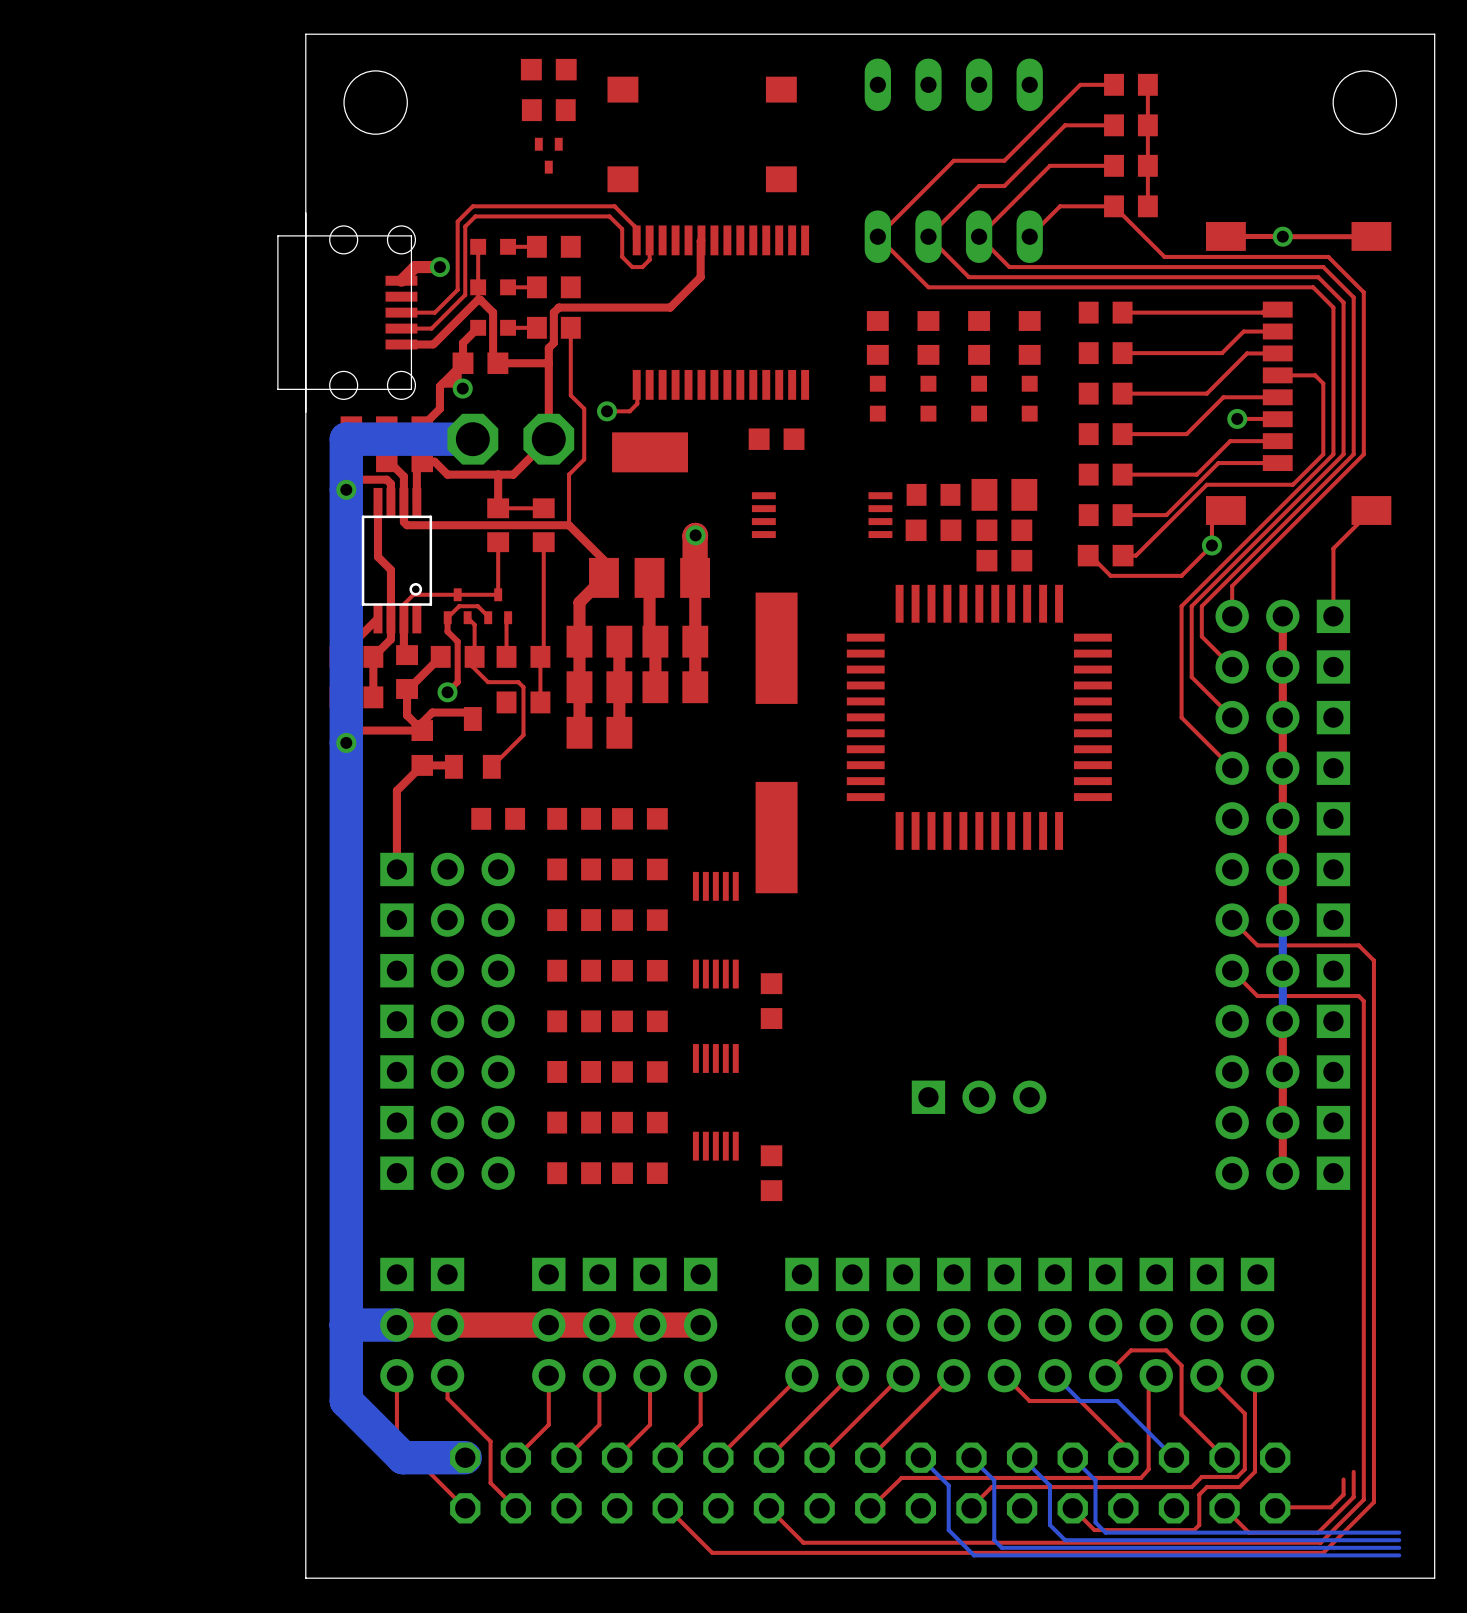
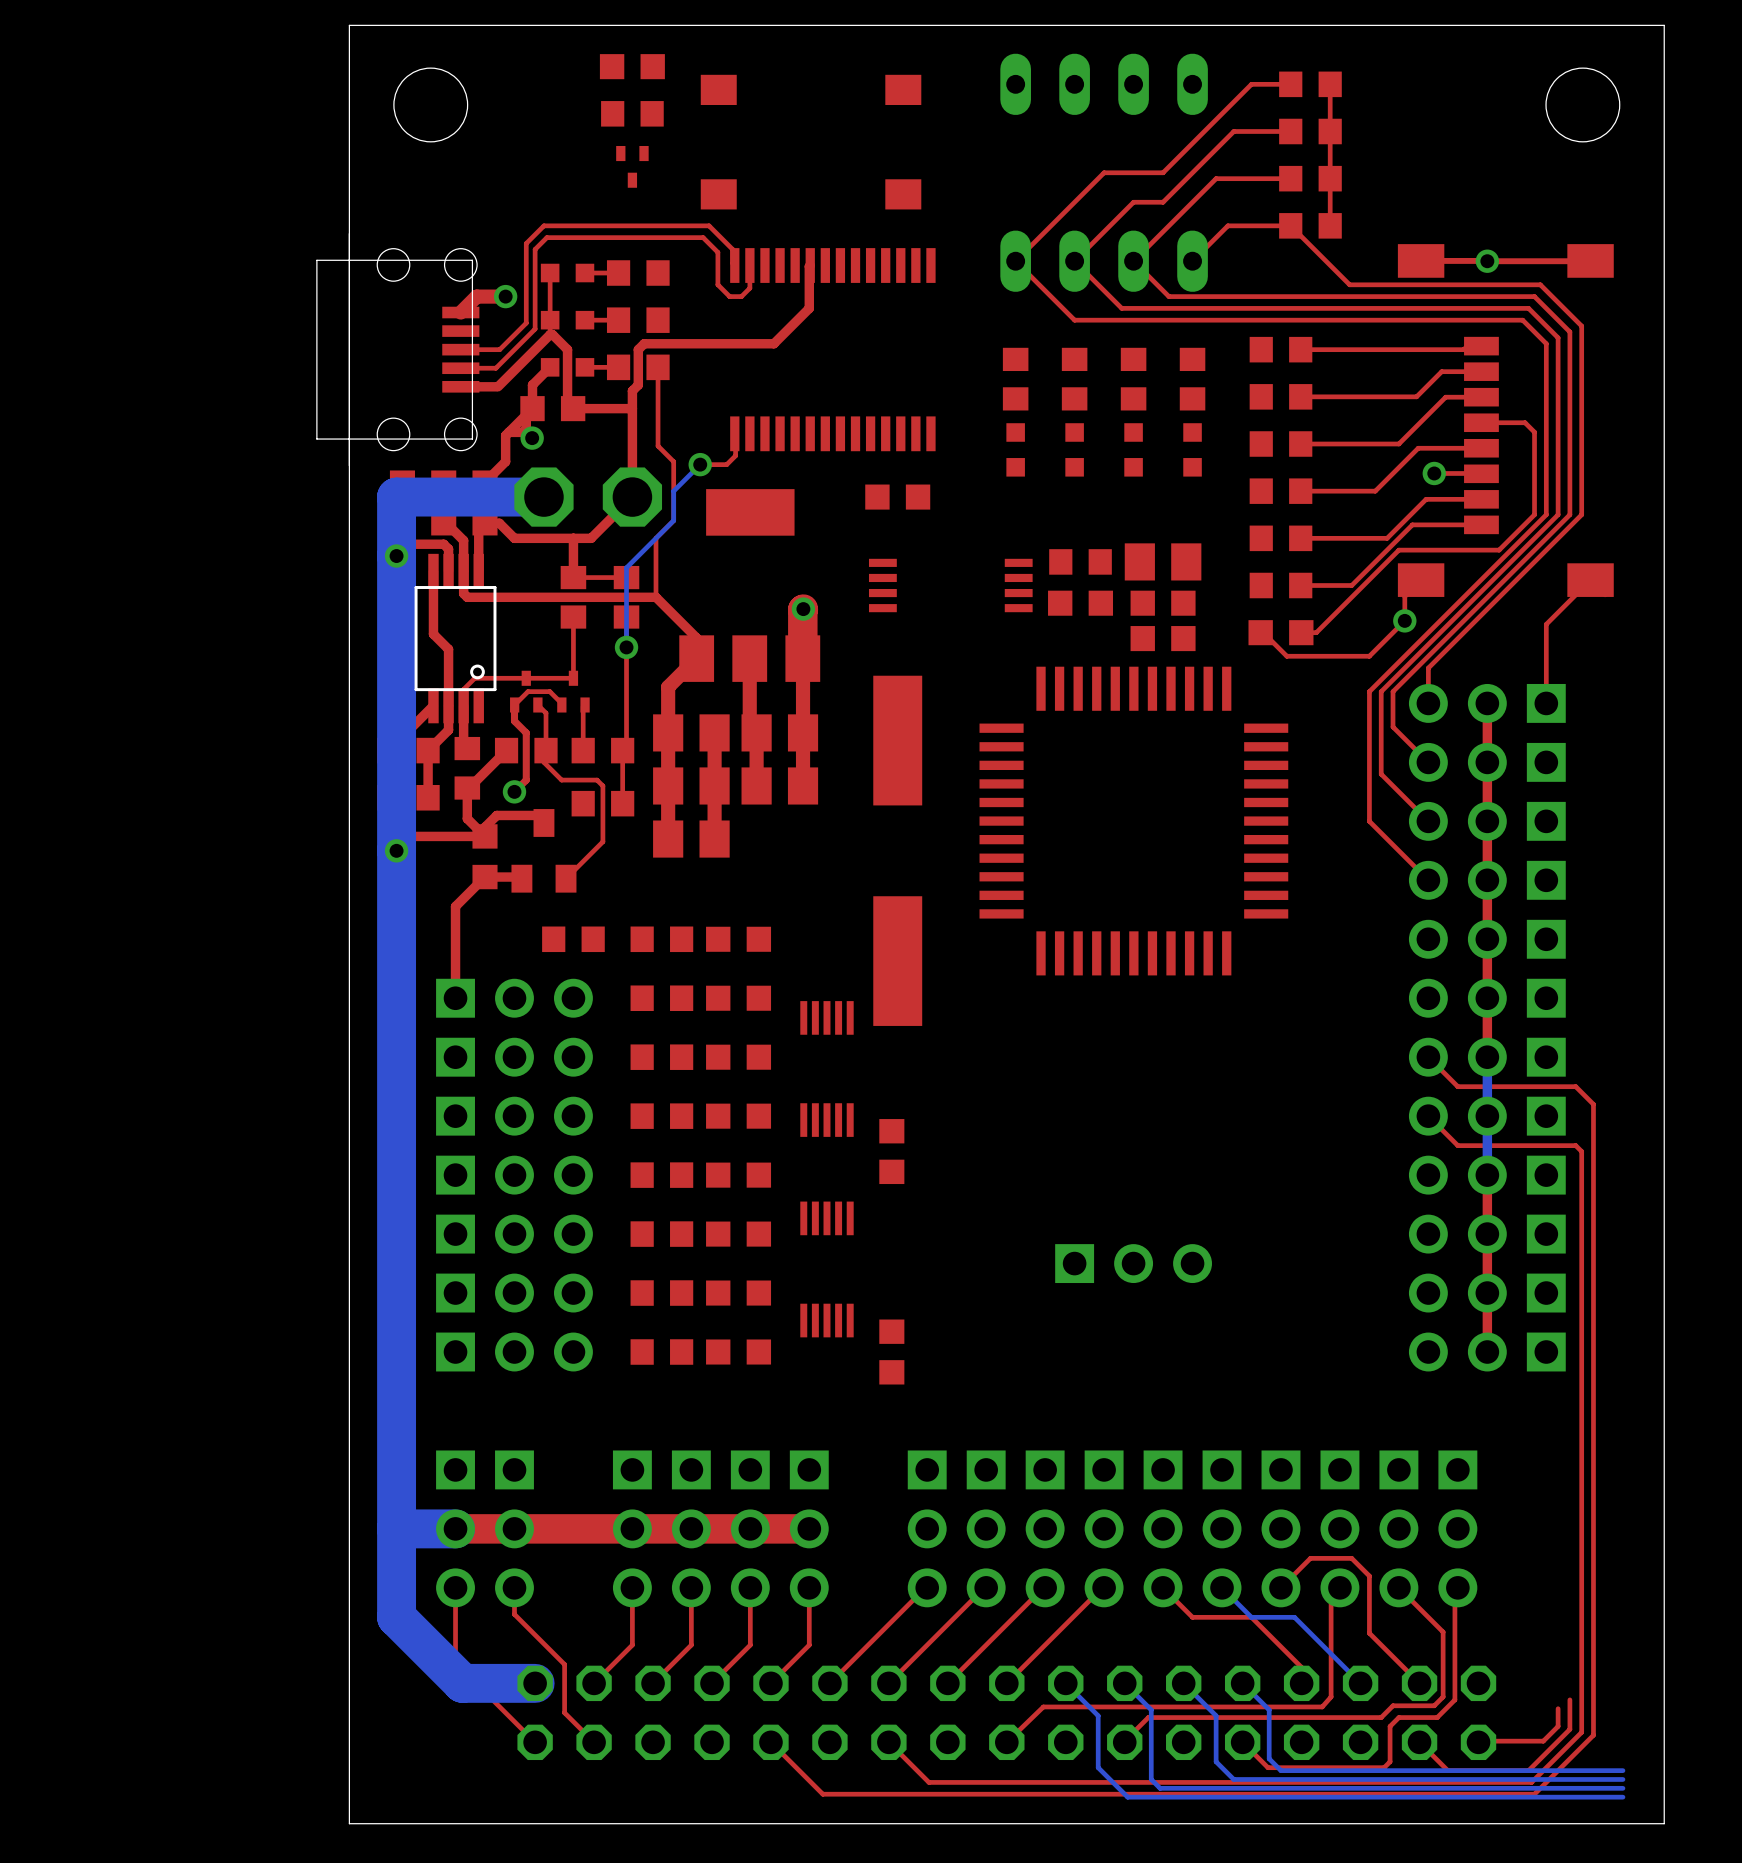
bottom track: none -> (700, 464) (673, 491) (673, 520) (626, 567) (626, 647)
via: none -> (626, 647)

